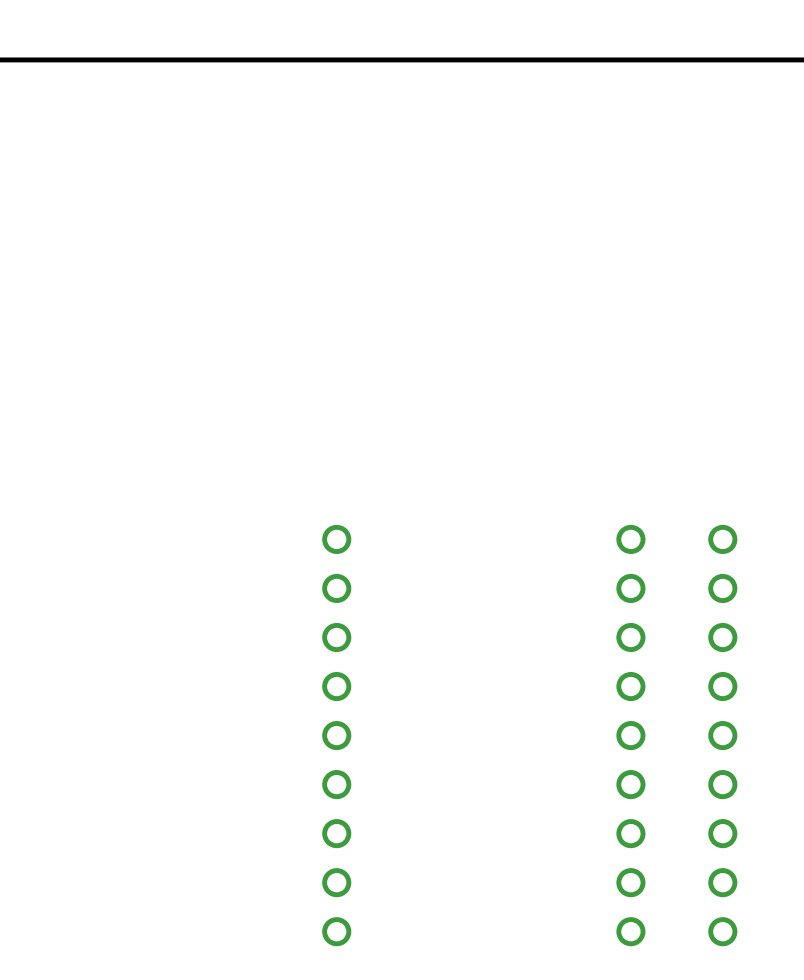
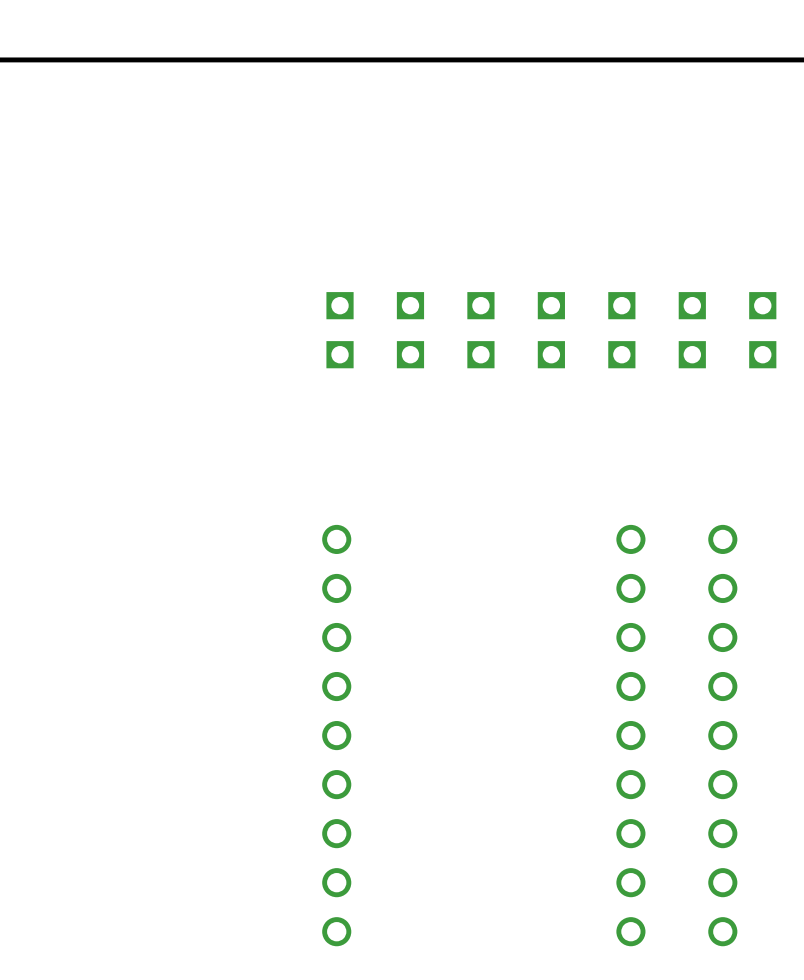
part: none -> (340, 330)
part: none -> (410, 330)
part: none -> (480, 330)
part: none -> (551, 330)
part: none -> (621, 330)
part: none -> (692, 330)
part: none -> (762, 330)

